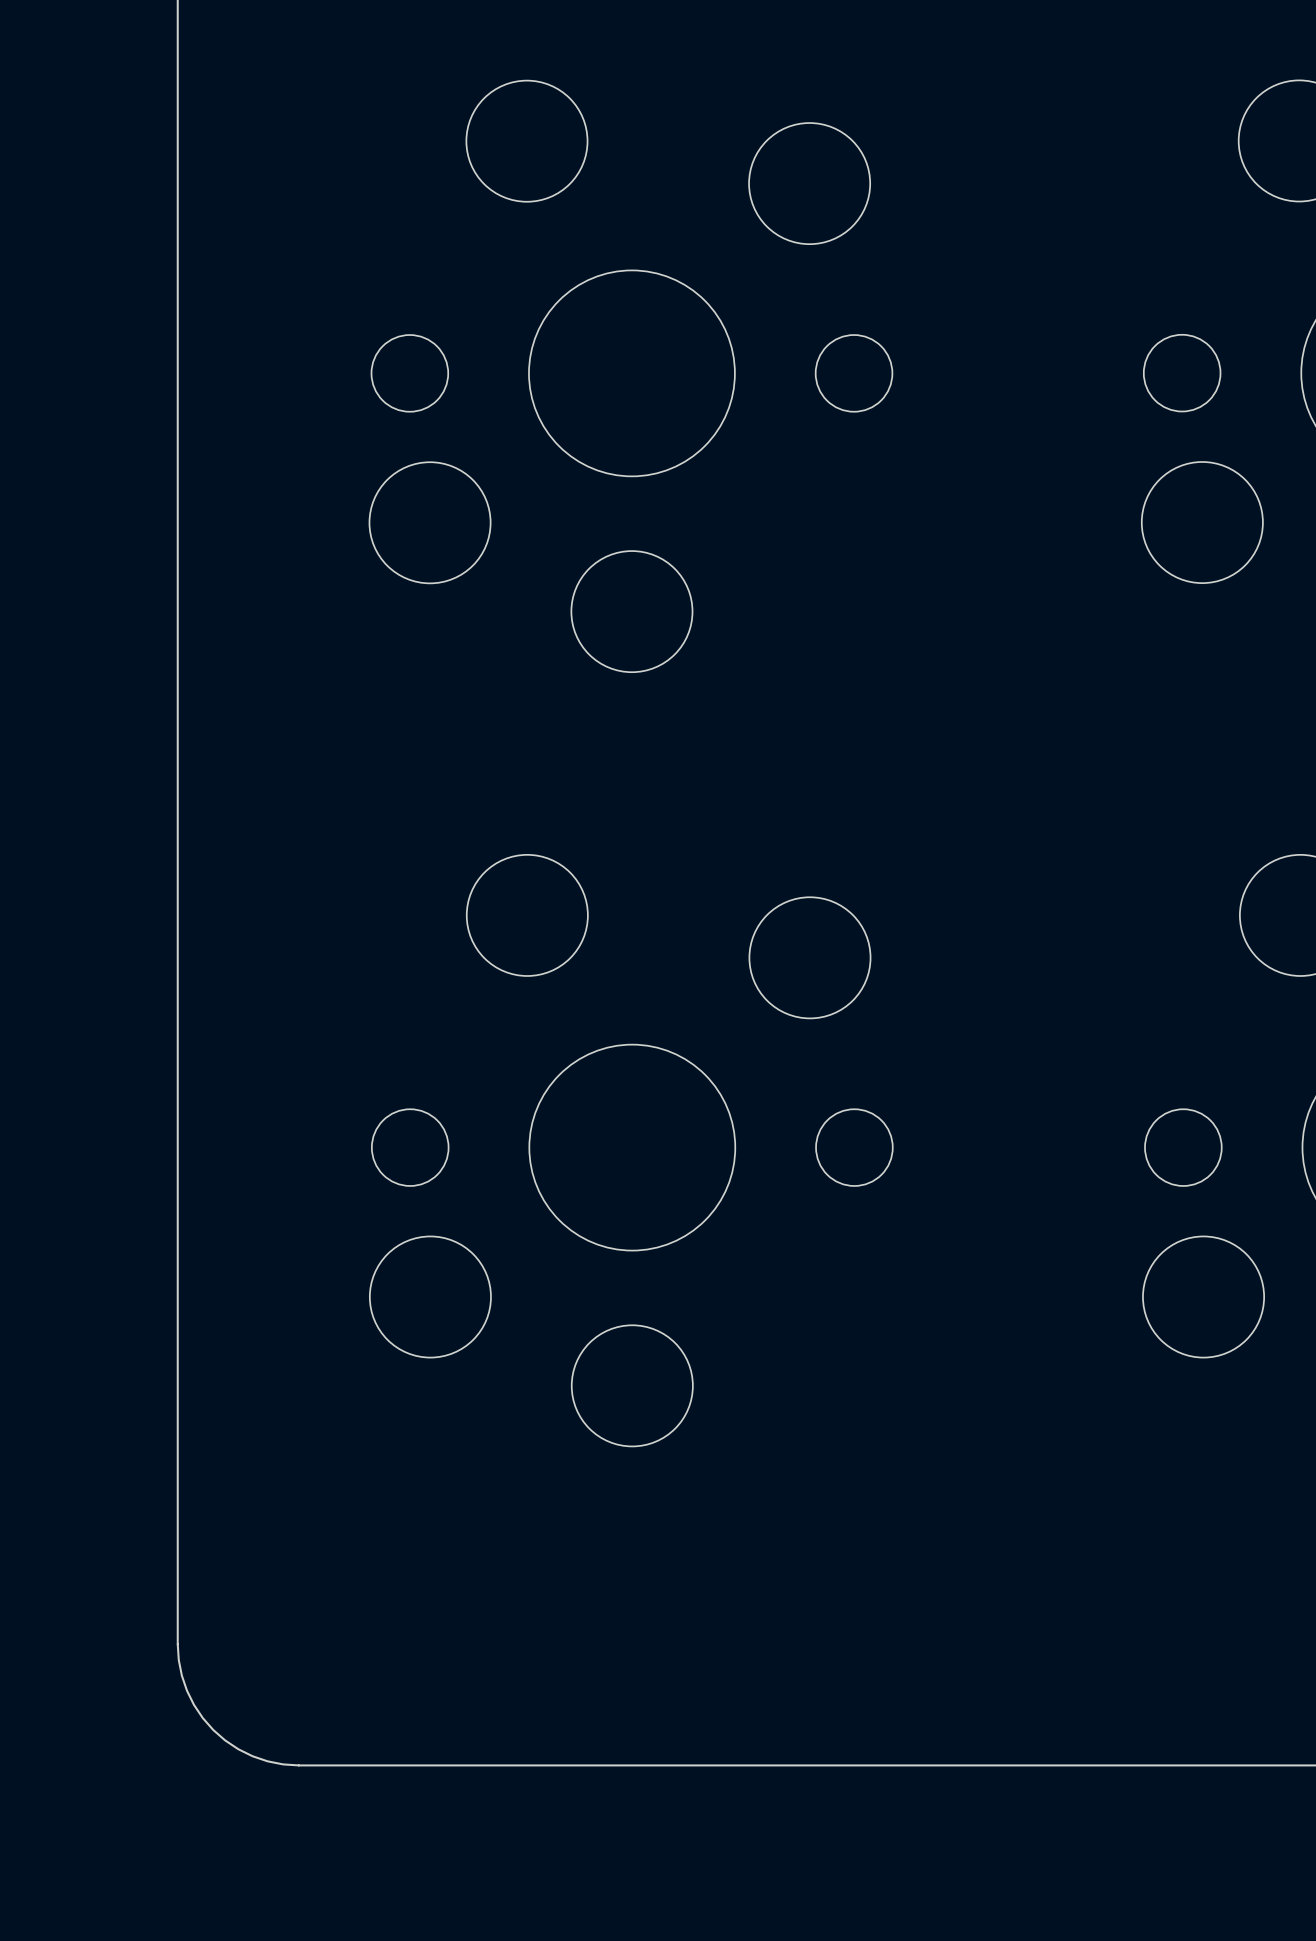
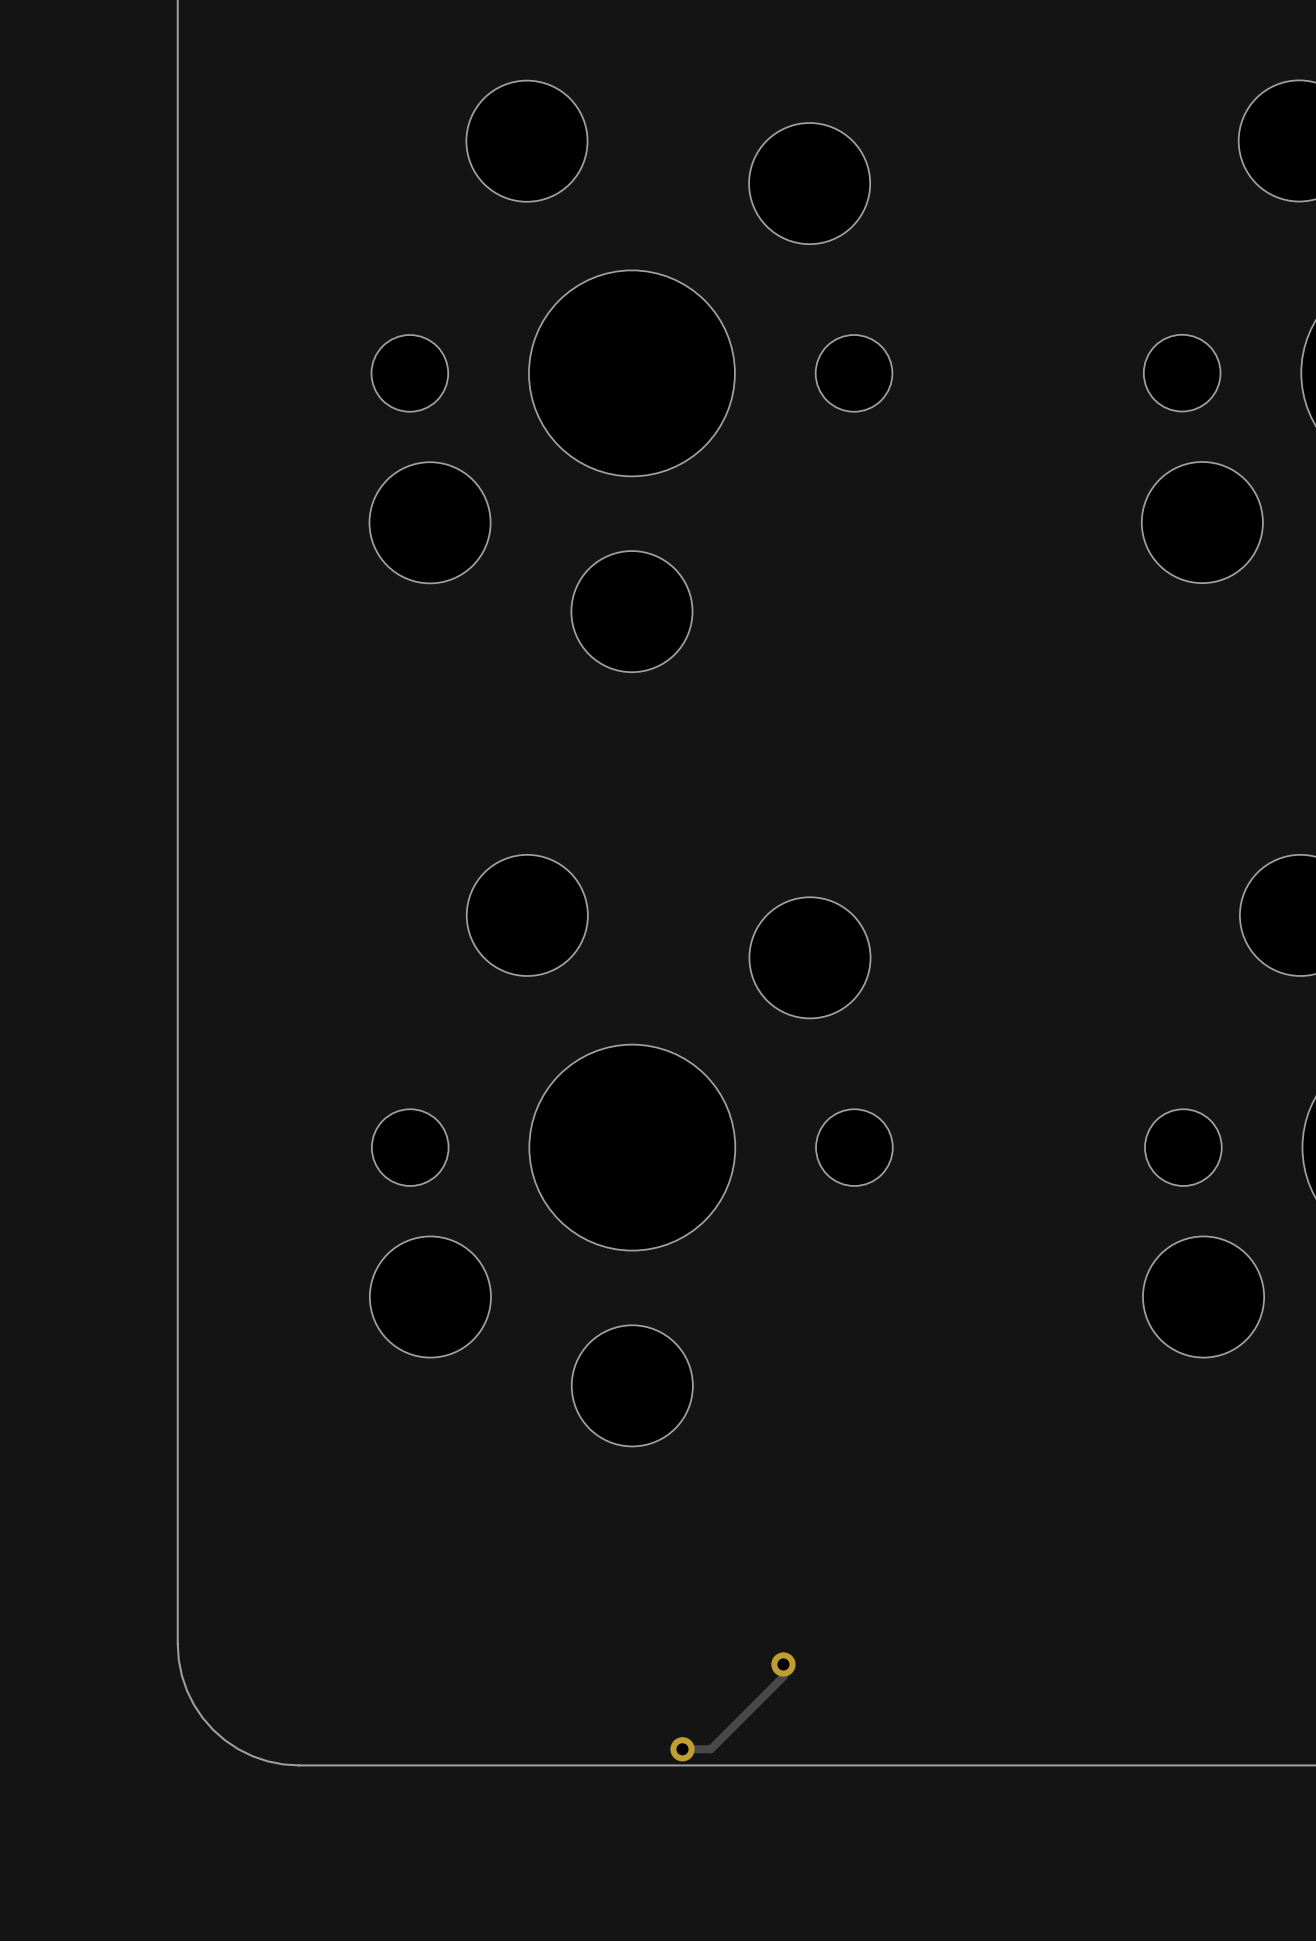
track: none -> (783, 1664) (783, 1676) (710, 1749) (682, 1749)
via: none -> (783, 1664)
via: none -> (682, 1749)

